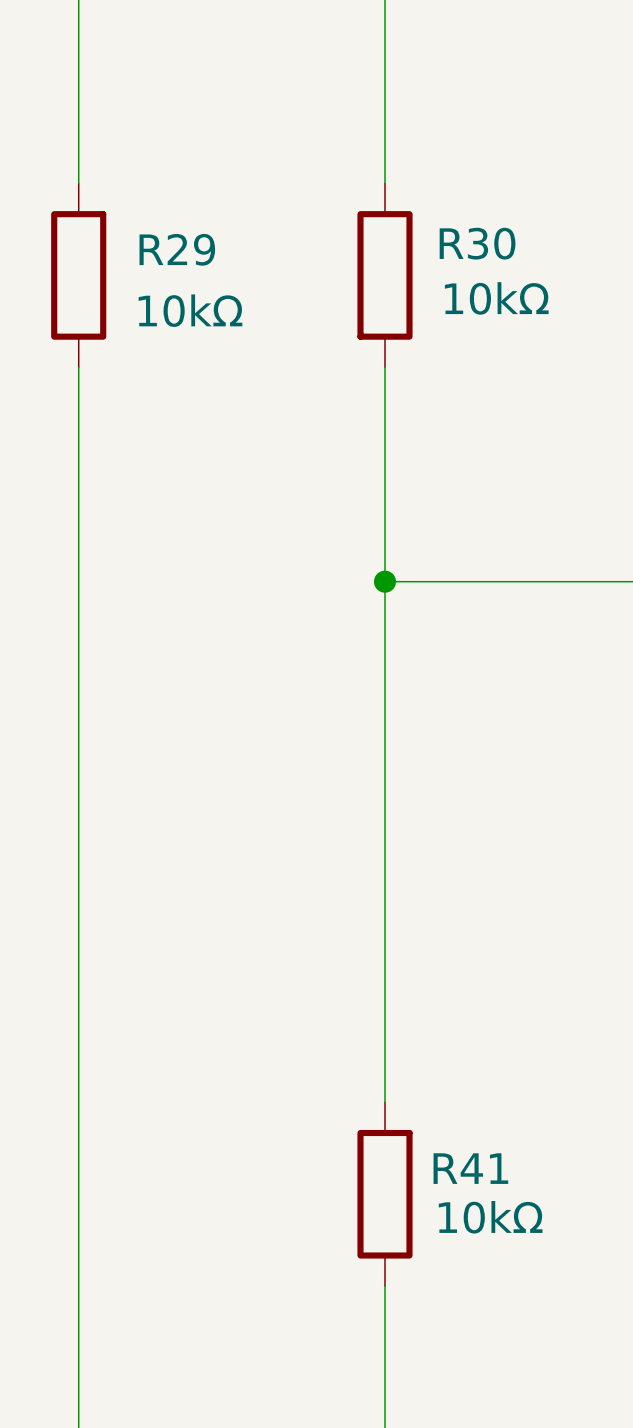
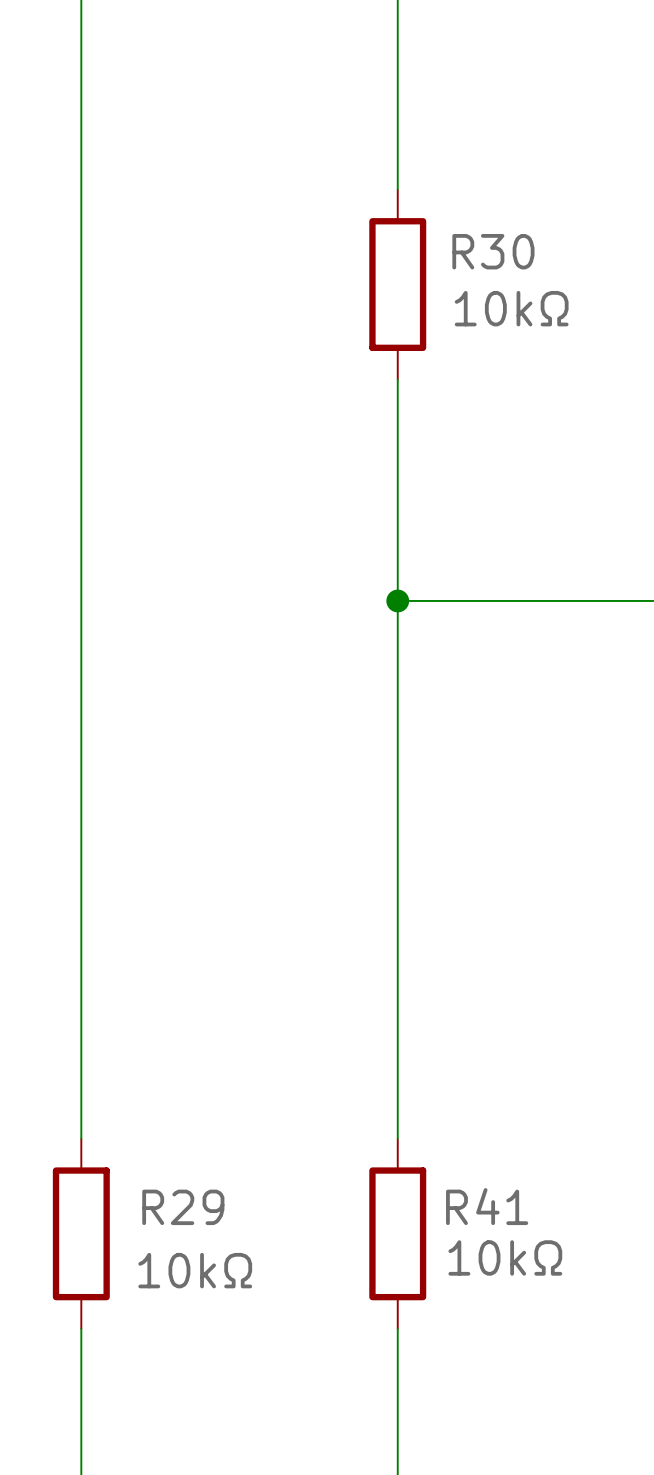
wire: none -> (81, 189) (81, 379)
R29 position: (78, 275) -> (81, 1233)
wire: (78, 1102) (78, 1286) -> none

